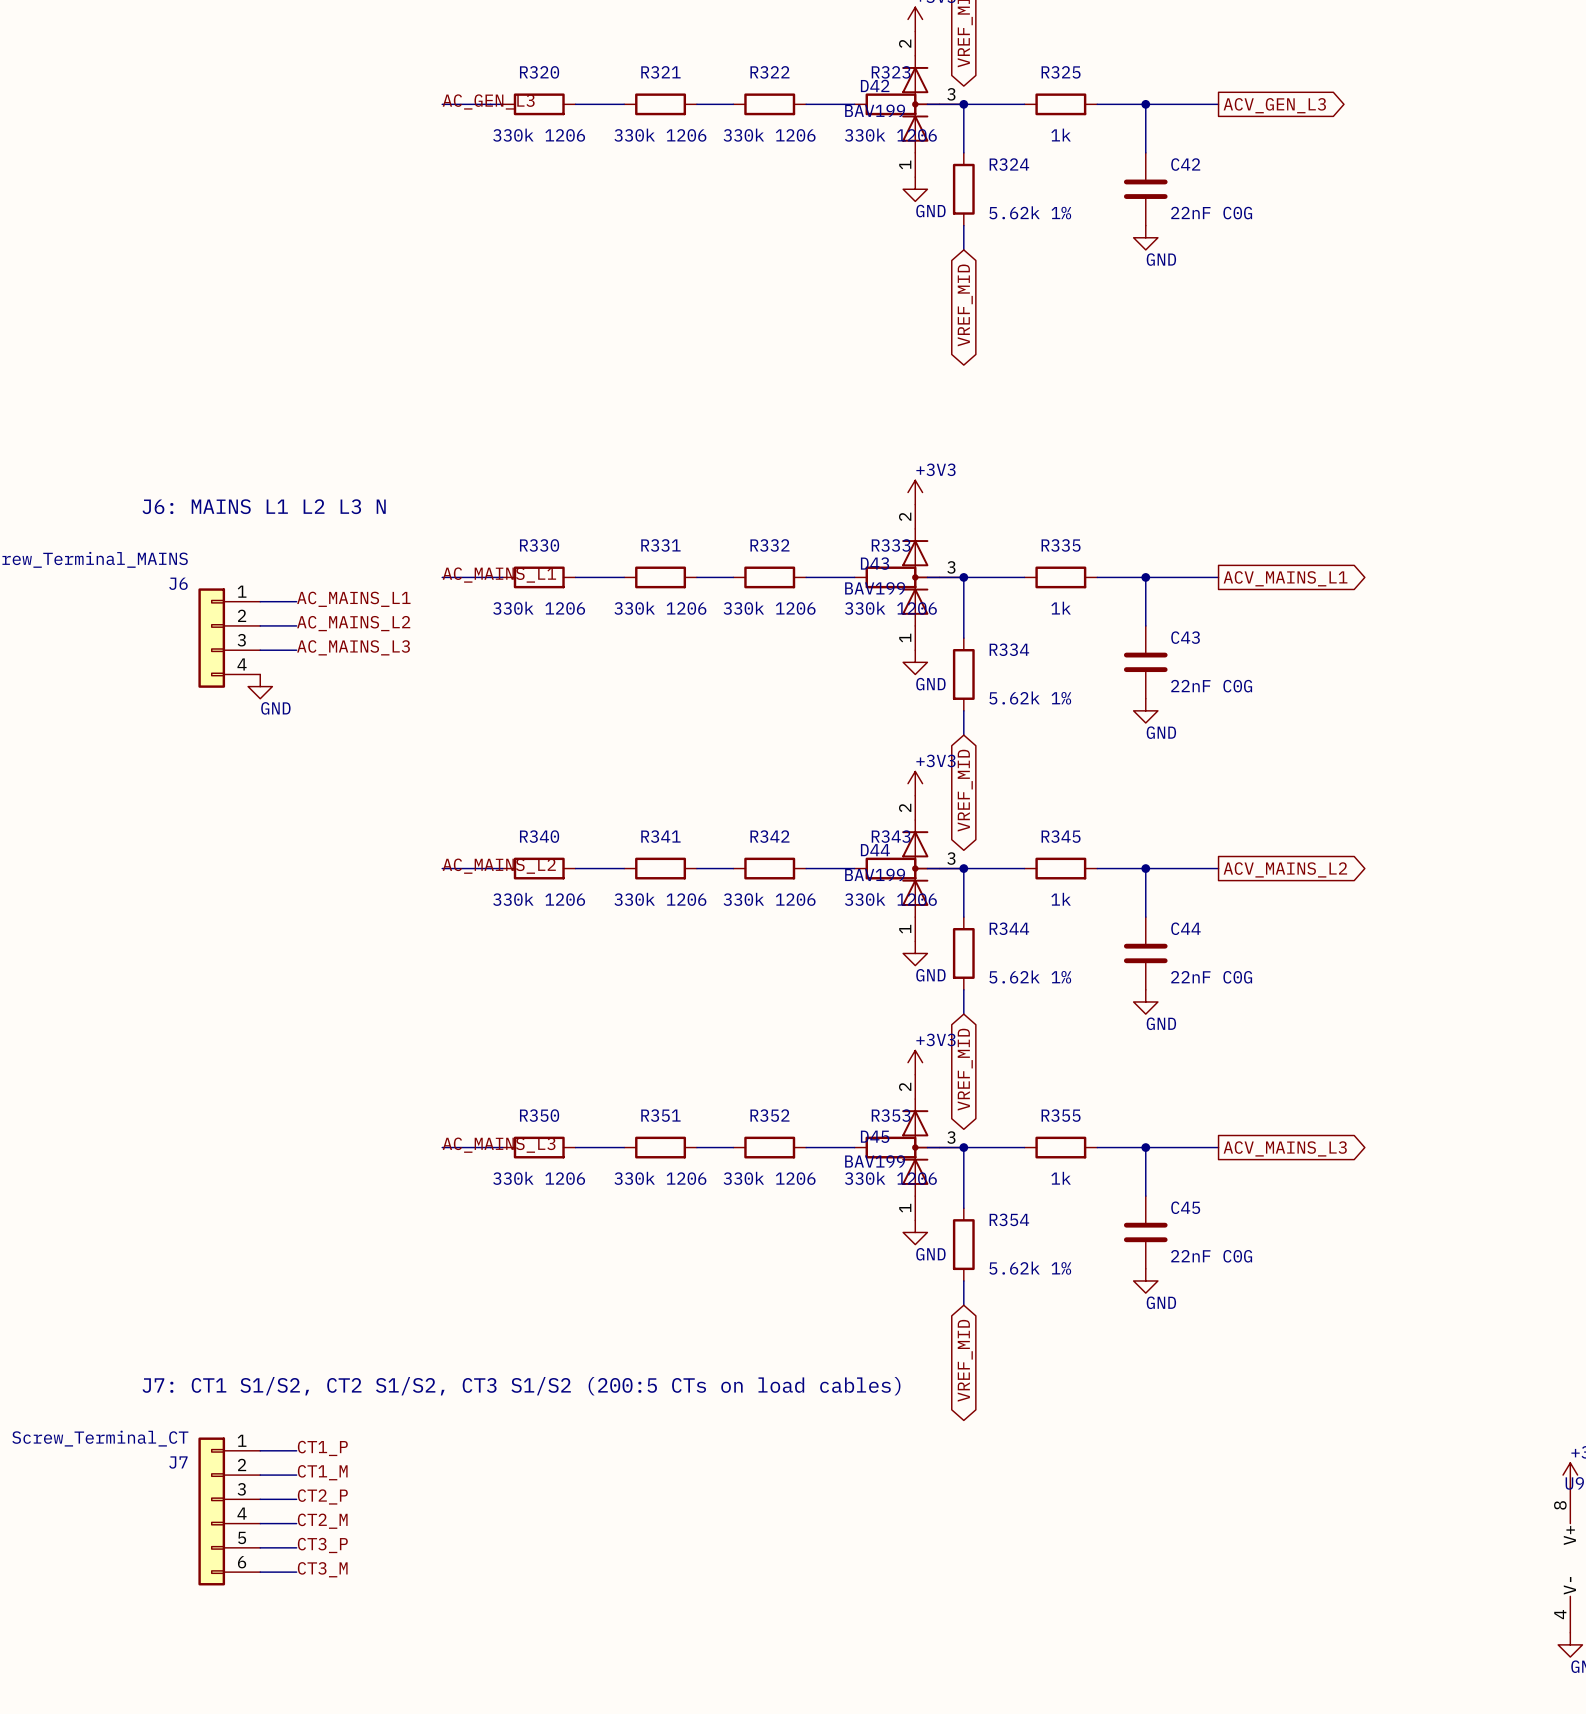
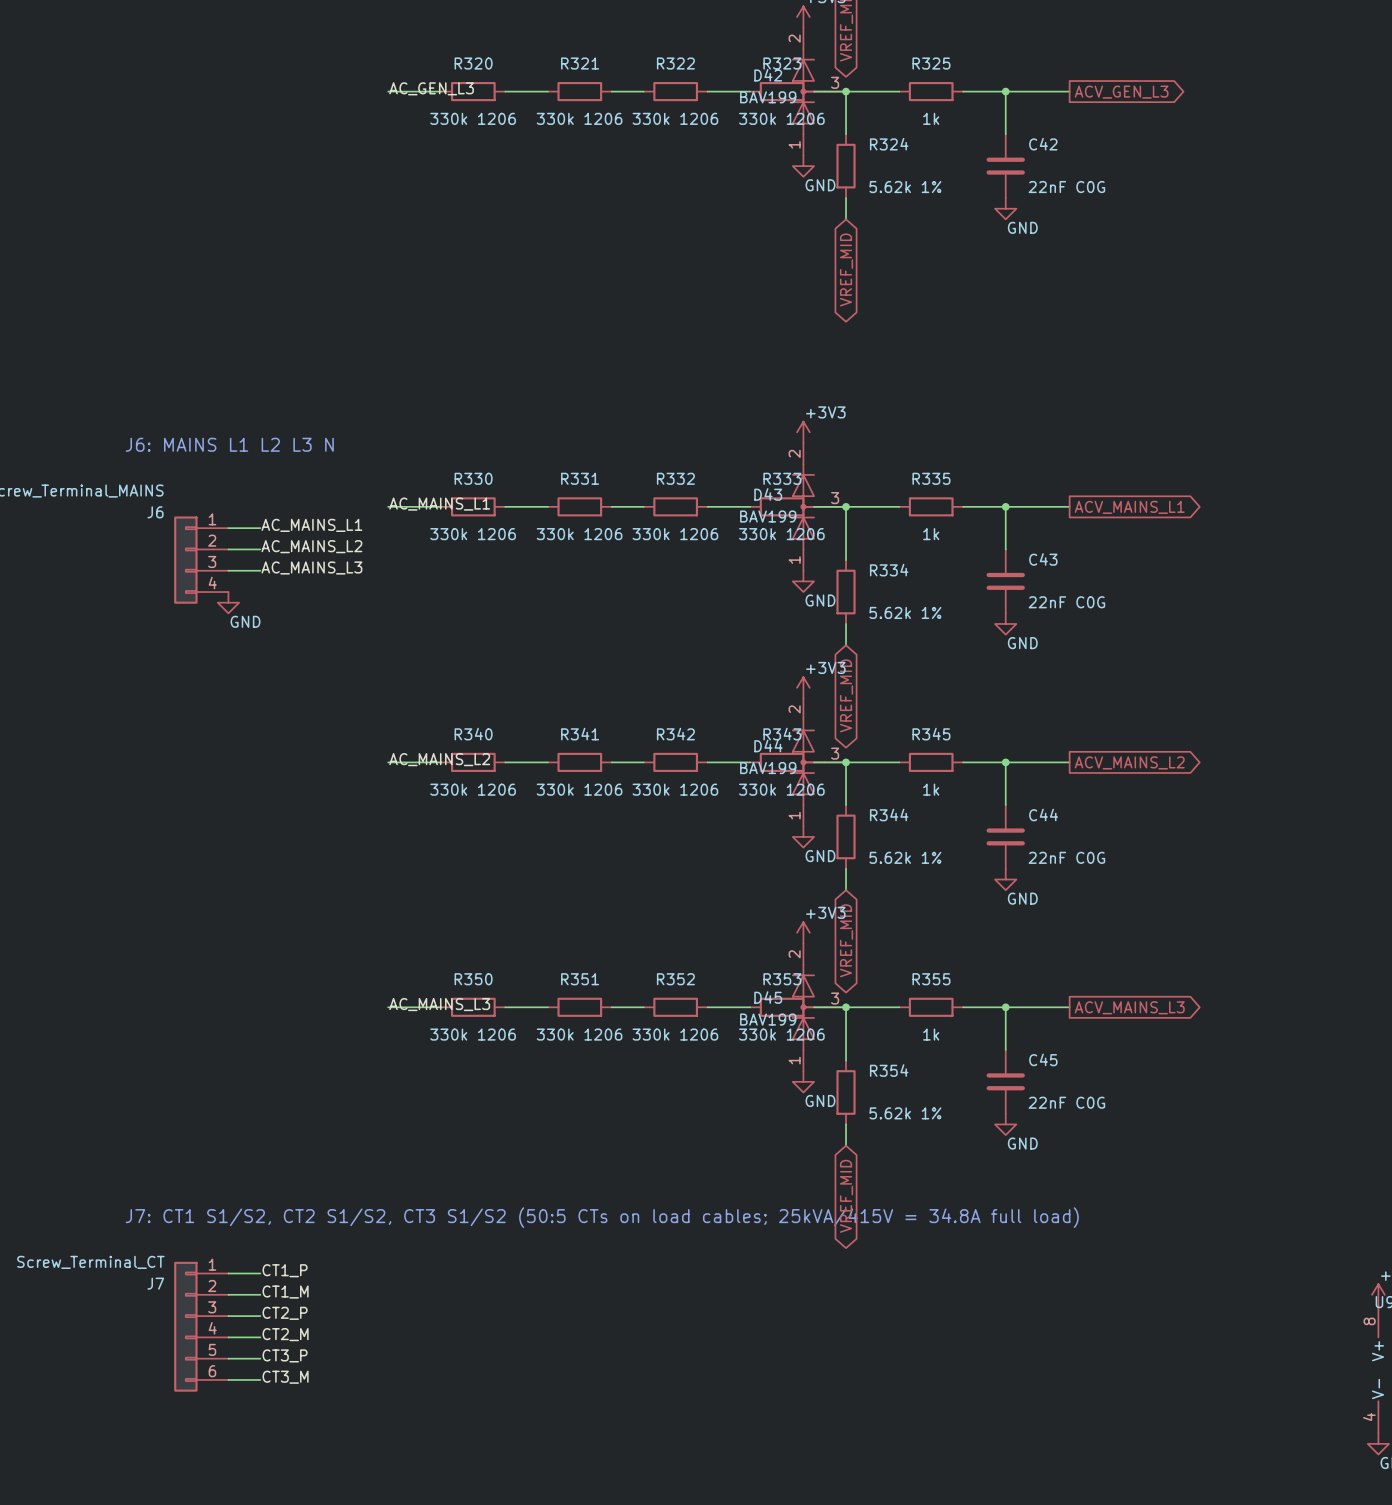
text: J7: CT1 S1/S2, CT2 S1/S2, CT3 S1/S2 (200:5 CTs on load cables) (521, 1386) -> J7: CT1 S1/S2, CT2 S1/S2, CT3 S1/S2 (50:5 CTs on load cables; 25kVA/415V = 34.8A full load) (602, 1217)

